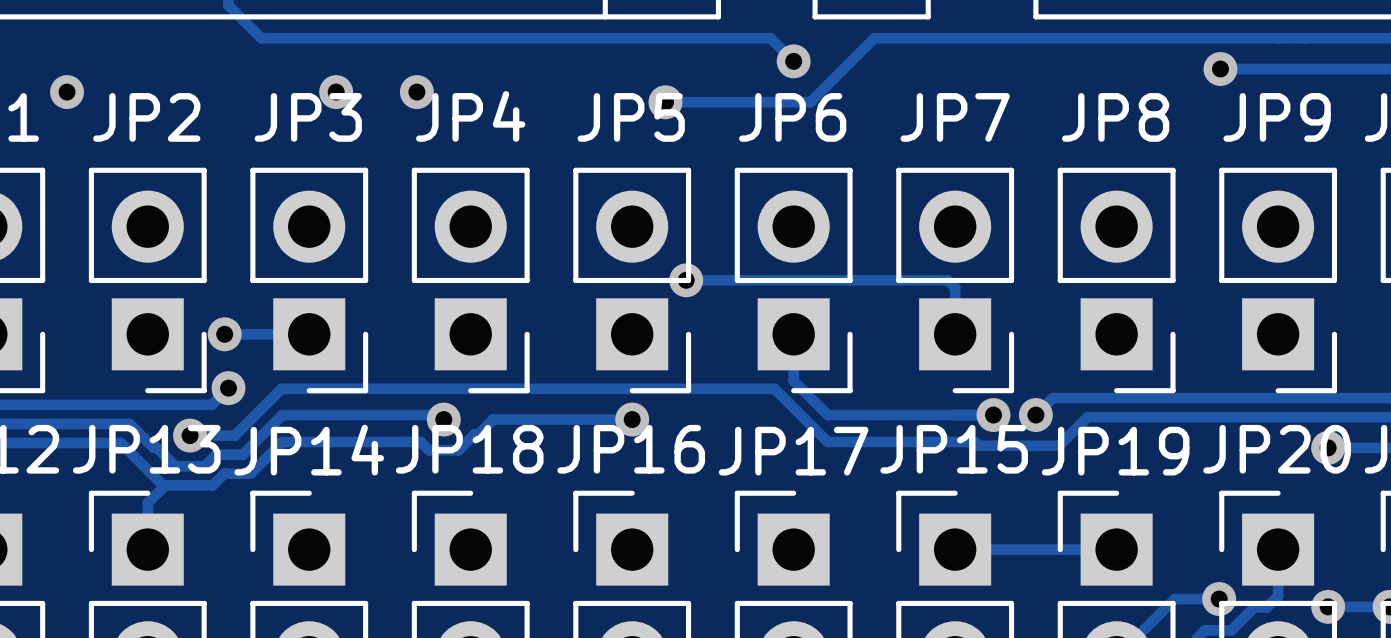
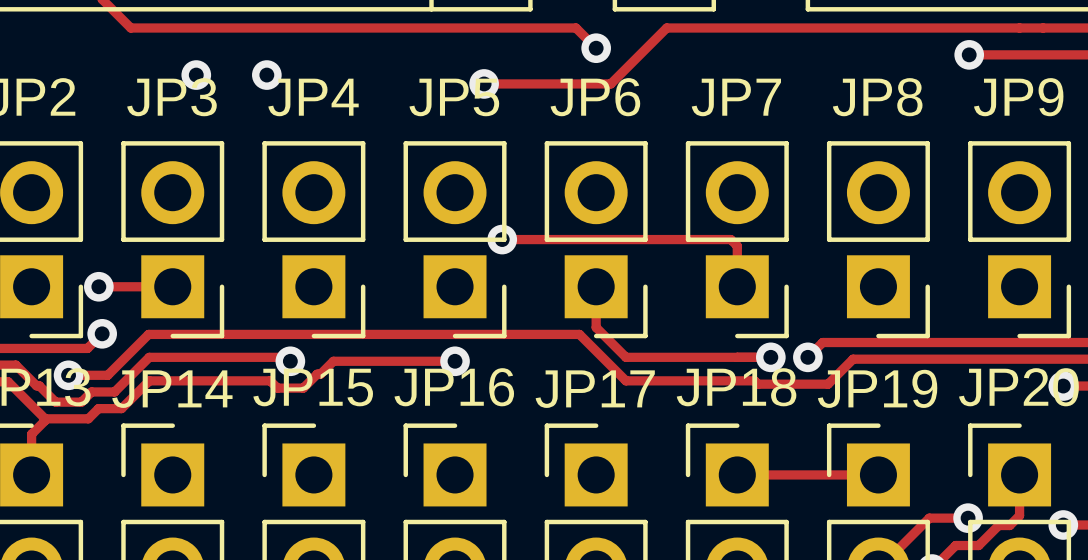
JP18 name: JP18 (469, 449) -> JP15 (313, 387)
JP15 name: JP15 (954, 449) -> JP18 (736, 387)

